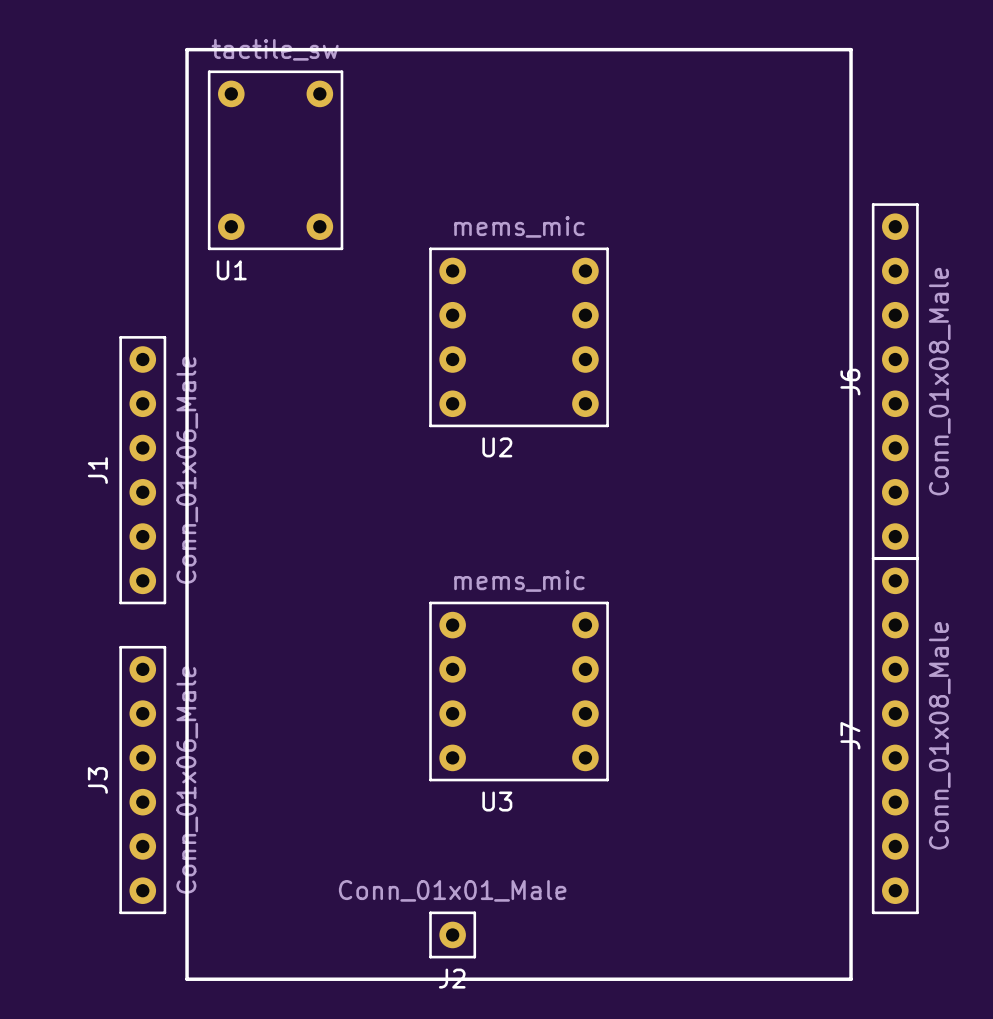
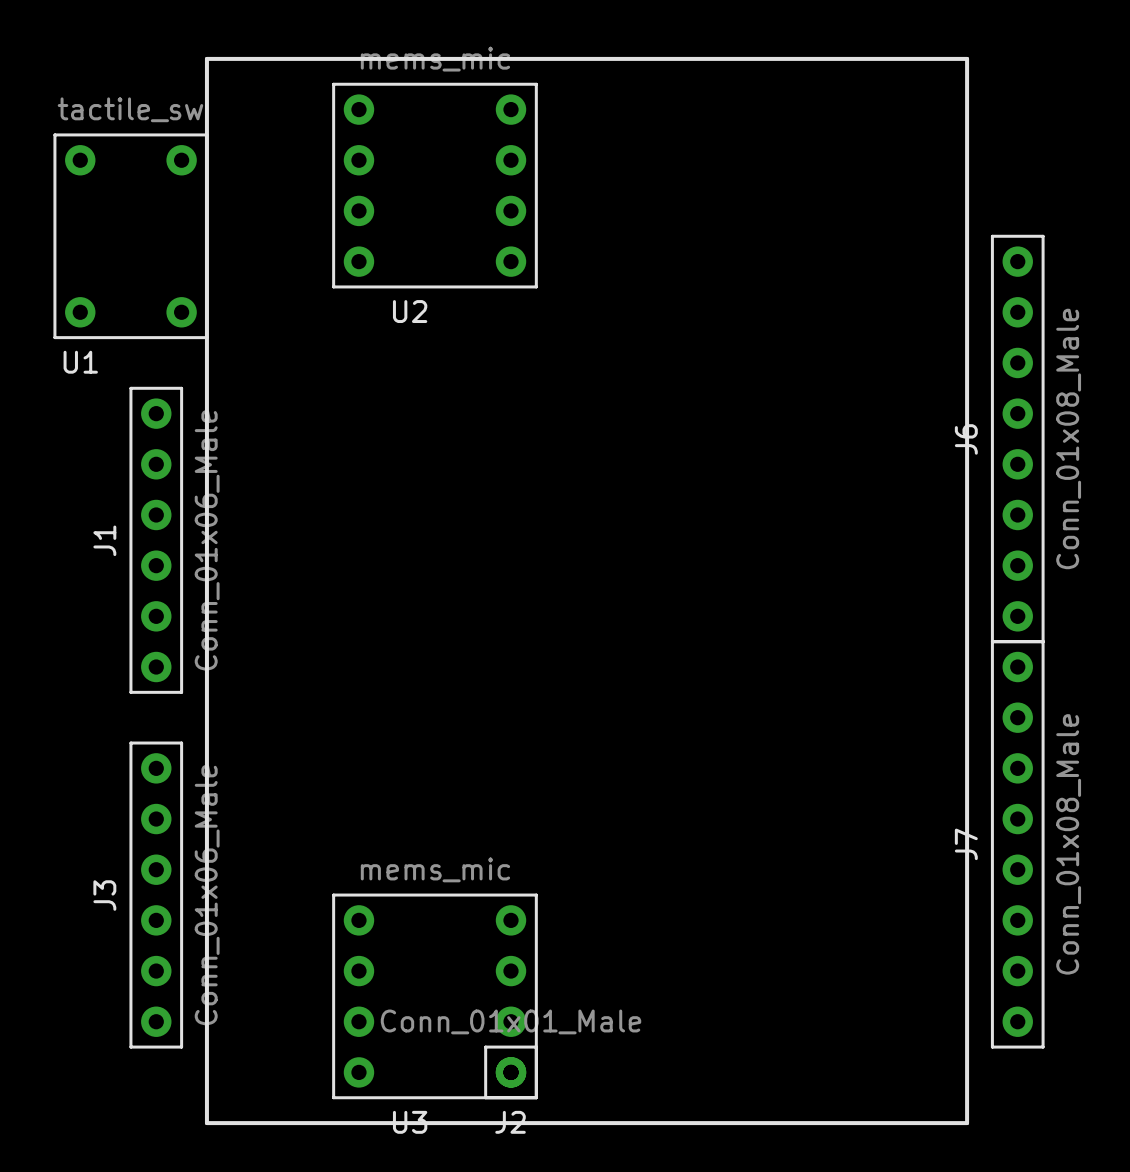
U1 position: (275, 160) -> (130, 236)
U2 position: (519, 337) -> (434, 185)
U3 position: (519, 691) -> (434, 996)

